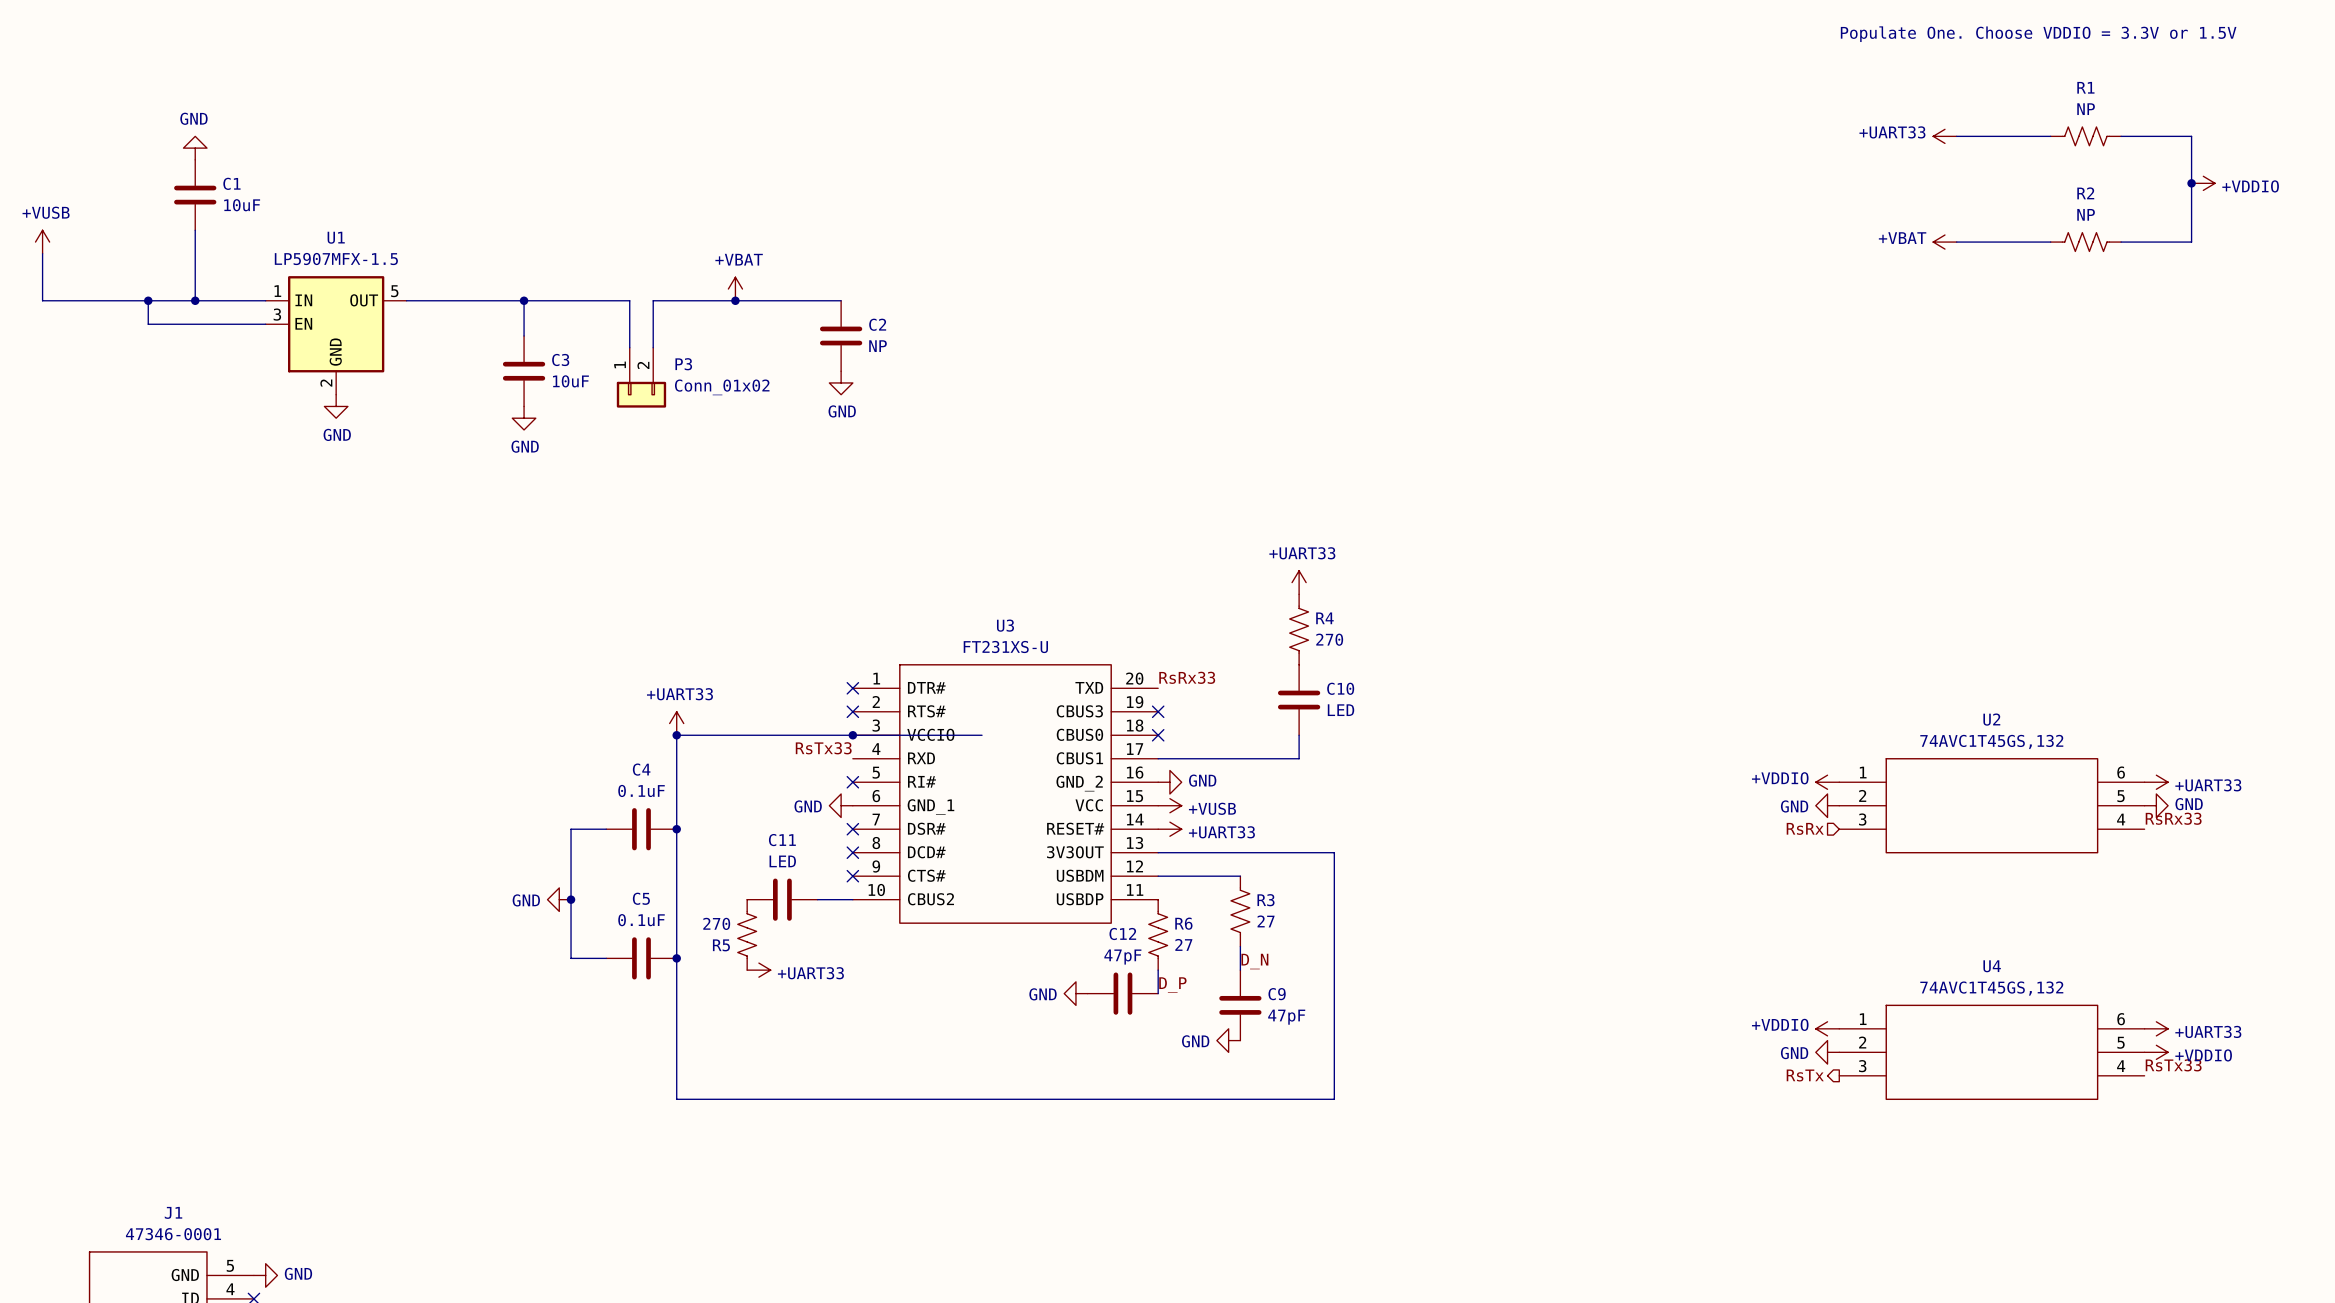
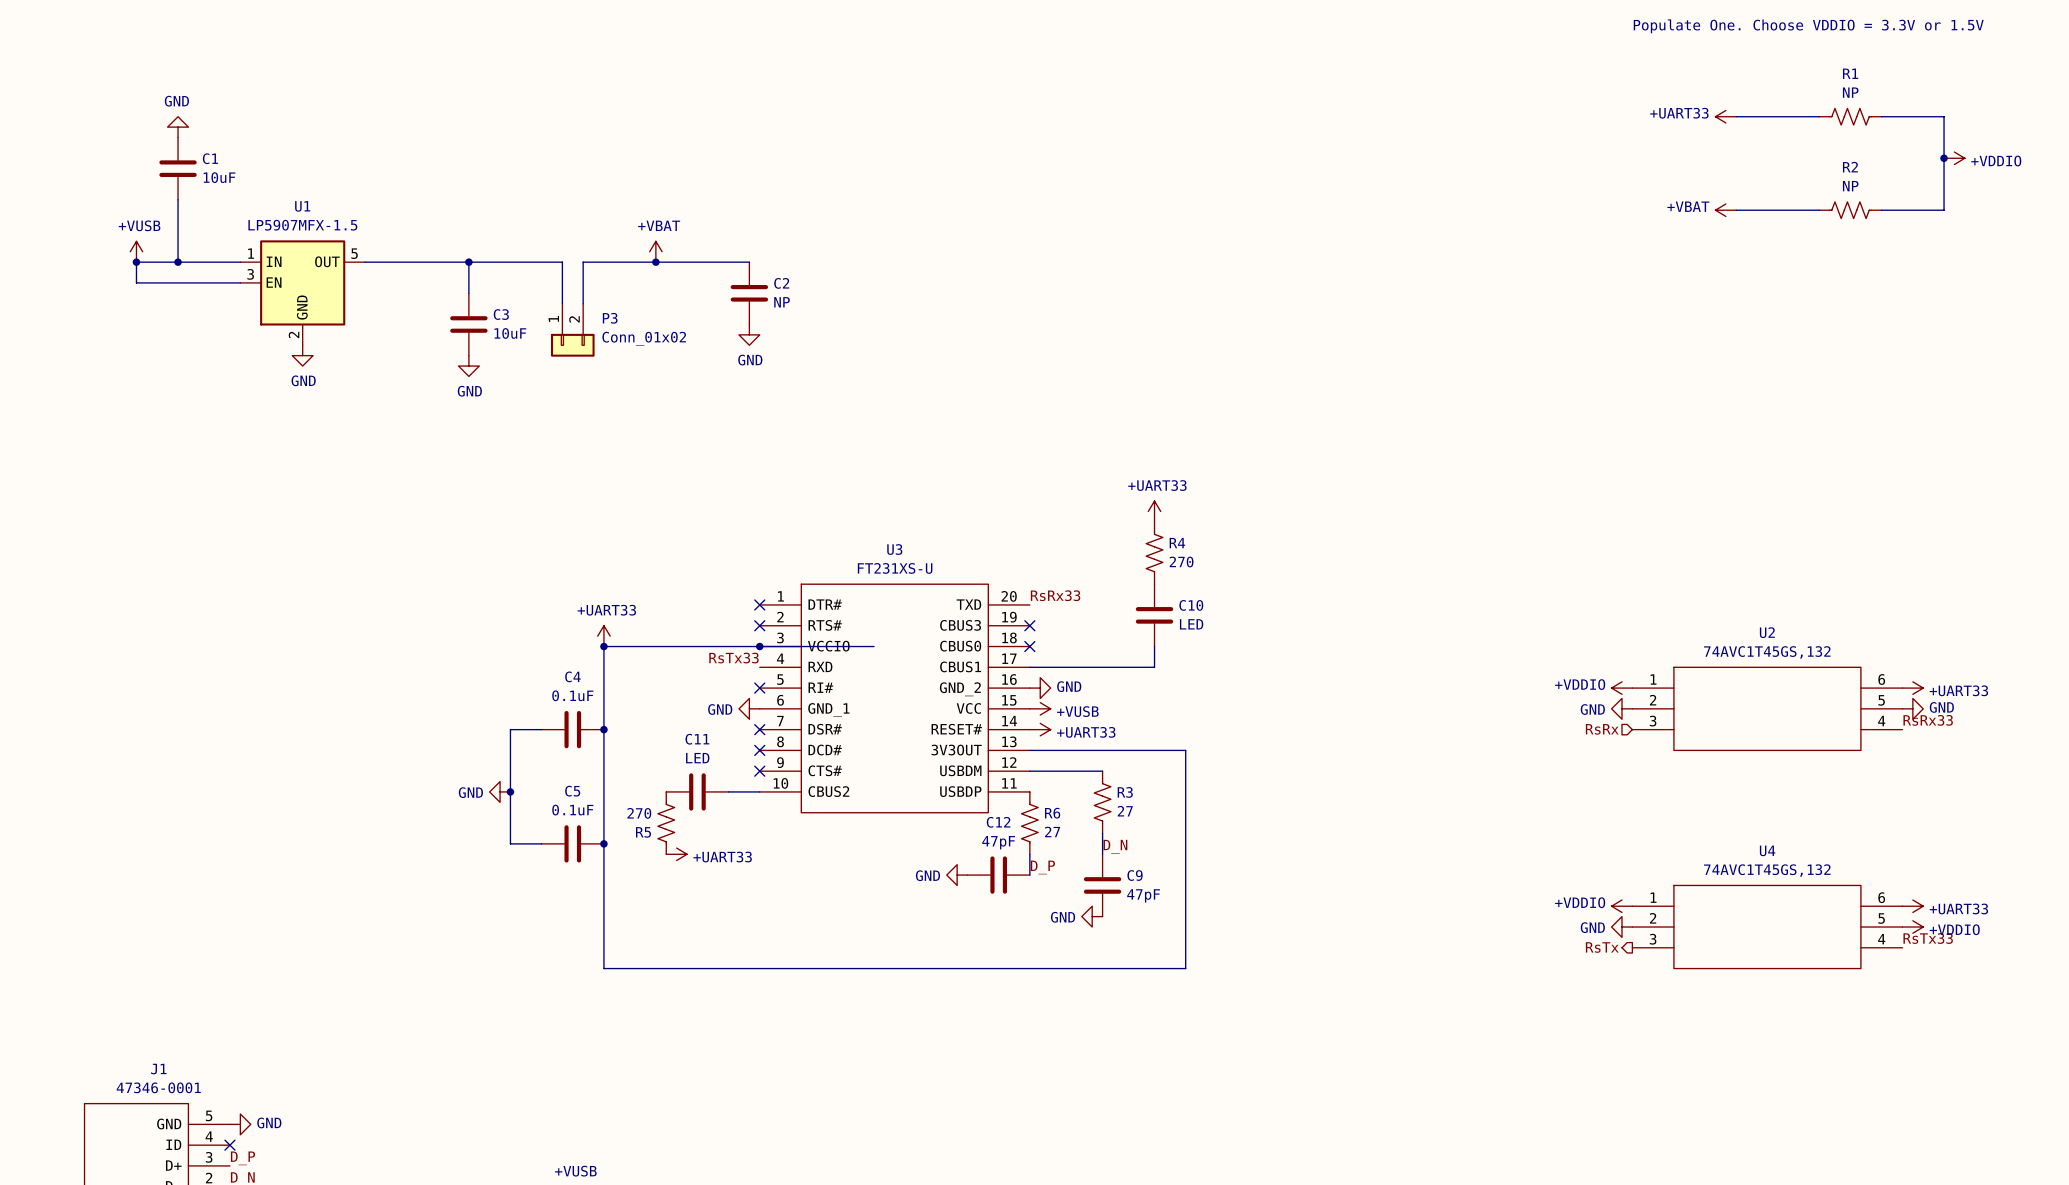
power symbol position: +VUSB (42, 242) -> +VUSB (136, 251)
wire: (42, 253) (42, 300) (148, 300) -> none

